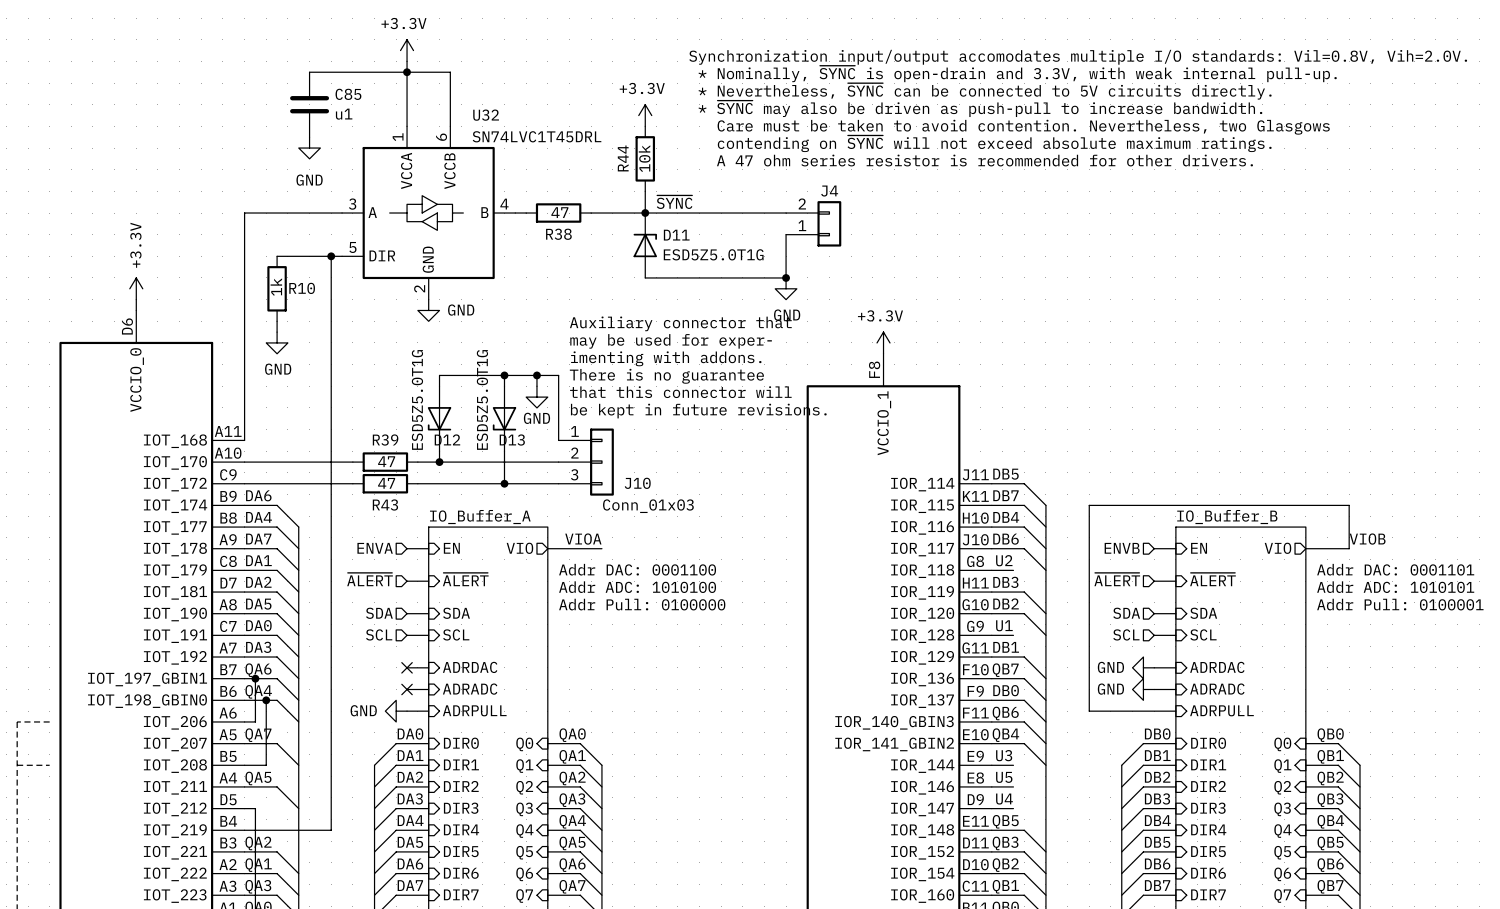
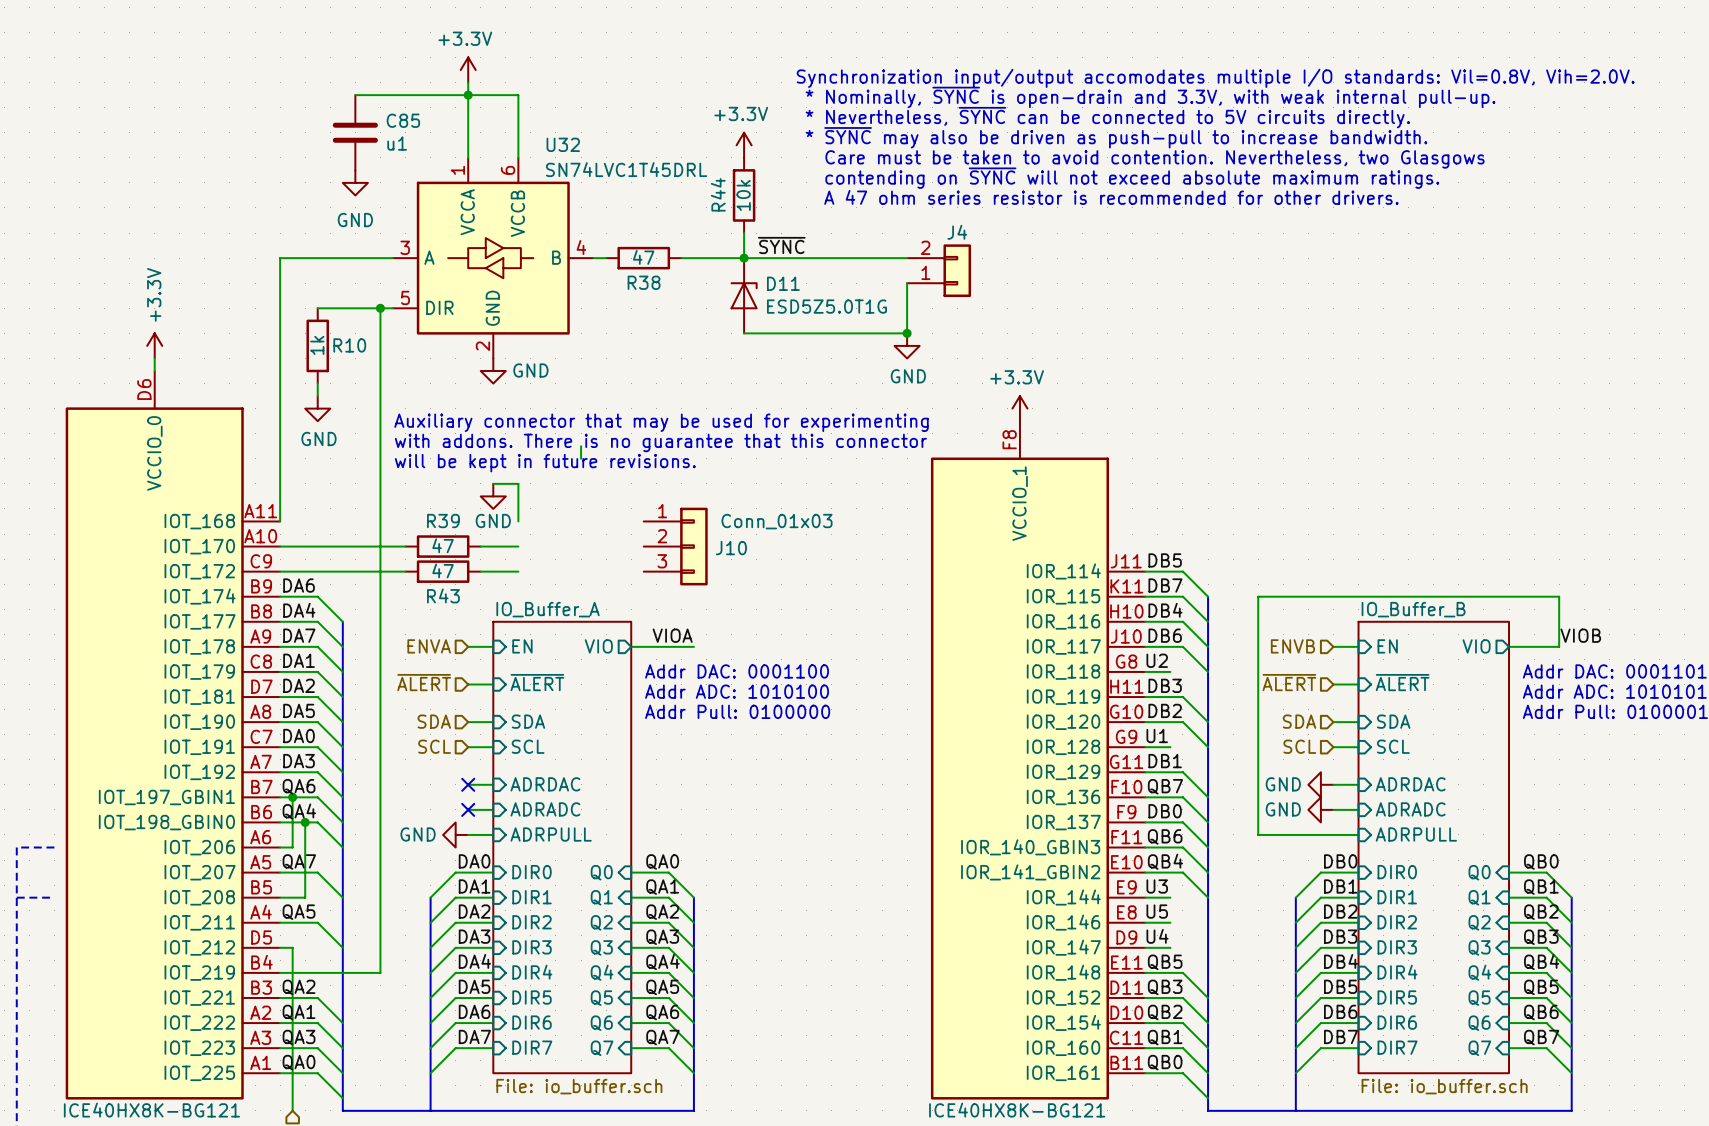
text: Auxiliary connector that (680, 323) -> none
text: may be used for exper- (671, 341) -> none
text: none -> Auxiliary connector that may be used for experimenting (661, 422)
text: imenting with addons. (666, 358) -> none
text: none -> with addons. There is no guarantee that this connector (660, 442)
junction: (504, 375) -> none
wire: (536, 375) (536, 386) -> none
junction: (536, 375) -> none
text: There is no guarantee (666, 376) -> none
wire: (439, 386) (439, 375) (558, 375) (558, 440) -> none
text: none -> will be kept in future revisions. (545, 463)
text: that this connector will (680, 392) -> none
power symbol position: GND (536, 397) -> GND (493, 496)
wire: none -> (493, 483) (518, 483) (518, 521)
text: be kept in future revisions. (698, 411) -> none
D12: ESD5Z5.0T1G (439, 418) -> none
D13: ESD5Z5.0T1G (504, 418) -> none
wire: (439, 451) (439, 462) -> none
wire: (504, 451) (504, 483) -> none
junction: (439, 462) -> none
wire: (450, 462) (558, 462) -> none
wire: (450, 483) (558, 483) -> none
junction: (504, 483) -> none
J10 name position: J10 (637, 483) -> J10 (731, 548)
J10 value position: Conn_01x03 (648, 506) -> Conn_01x03 (777, 521)

